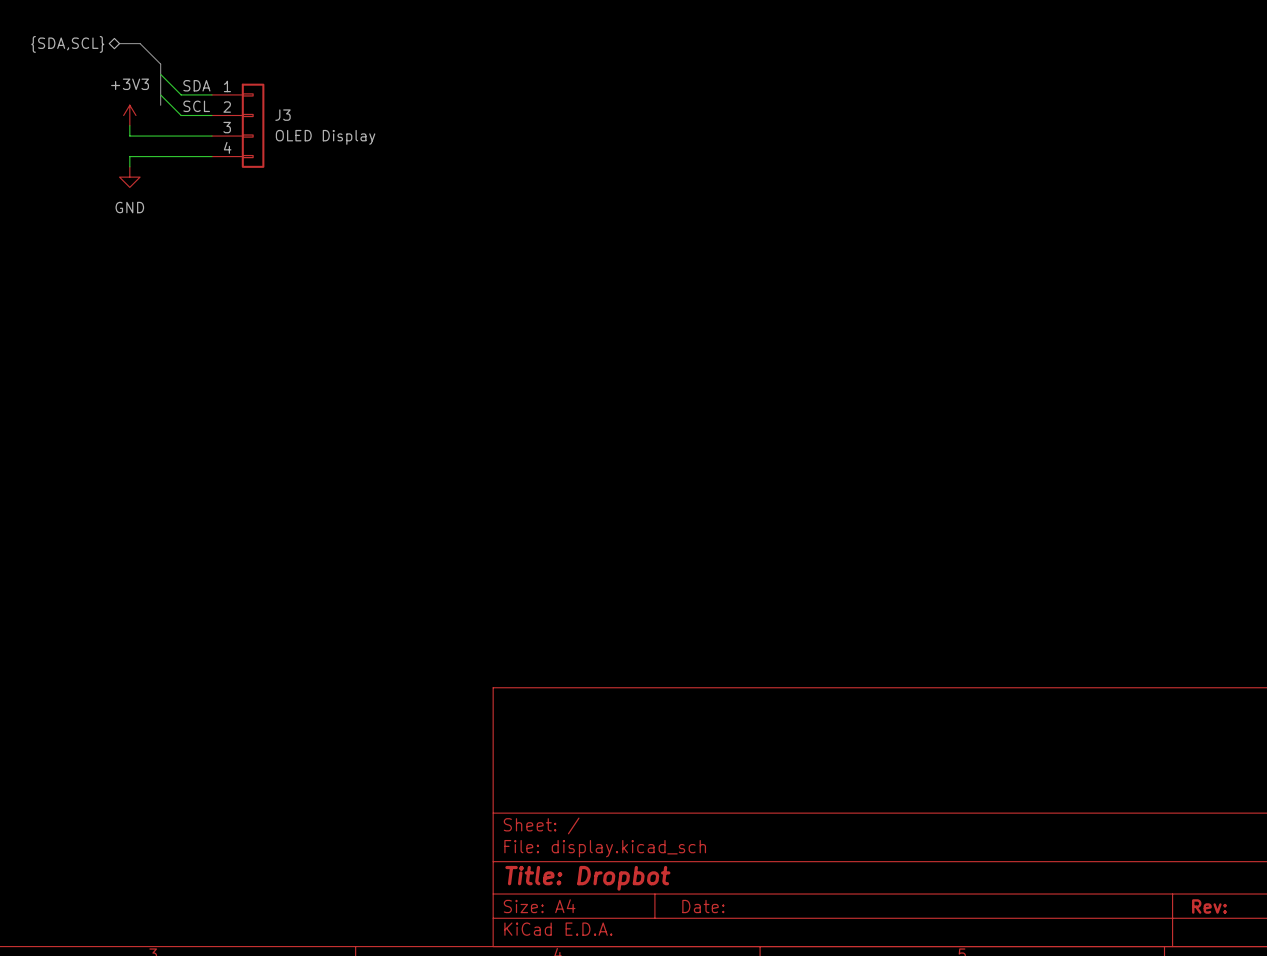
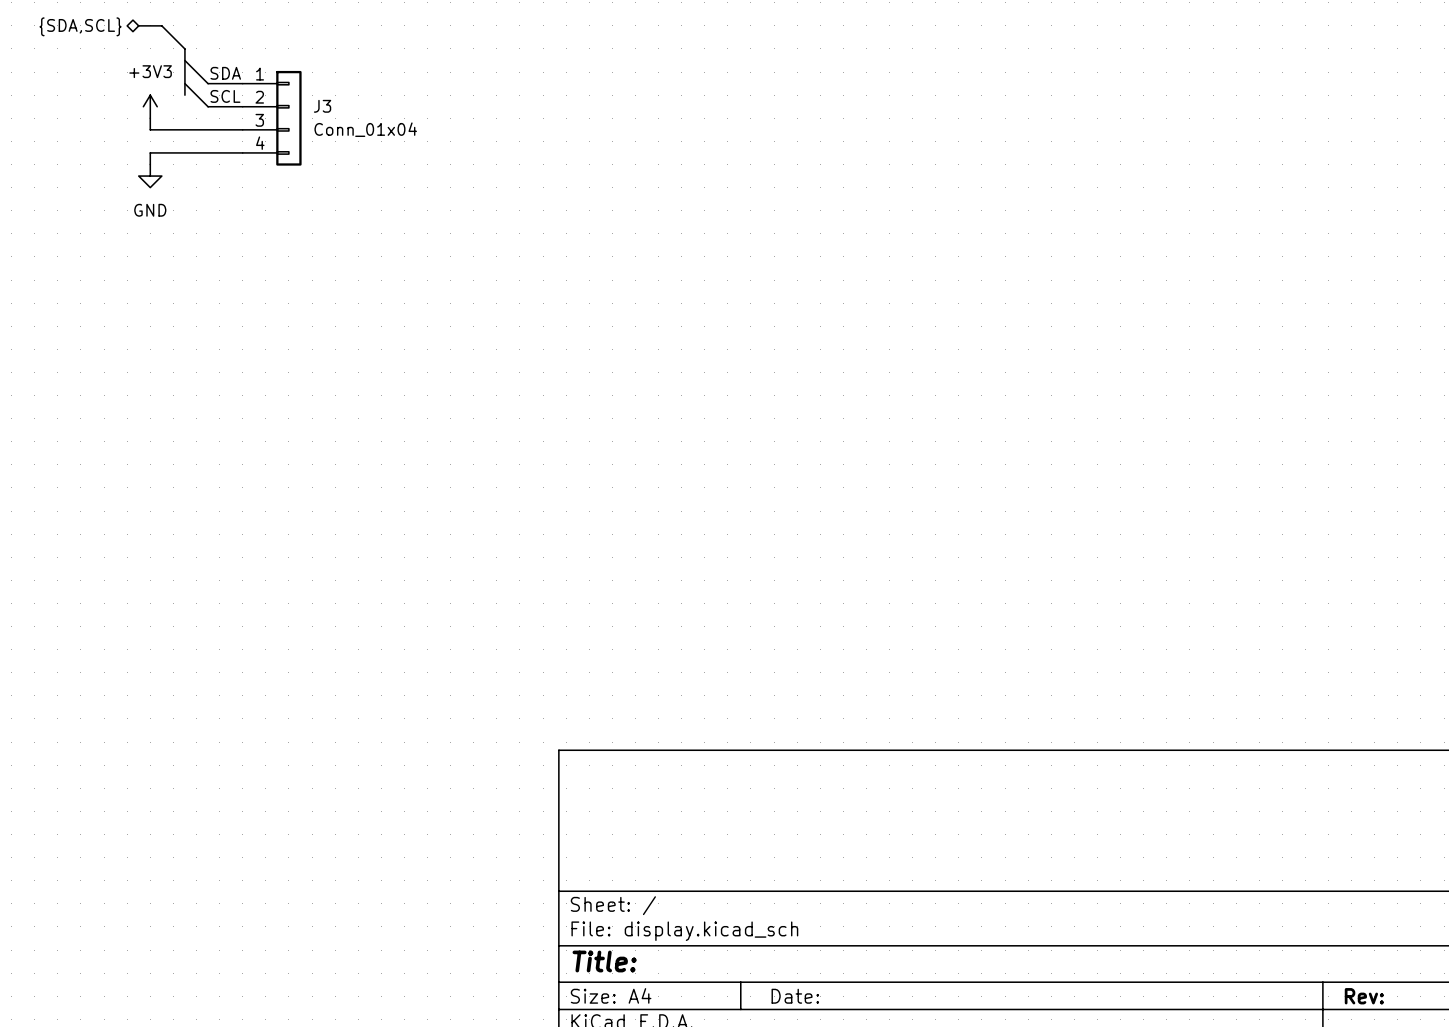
J3 value: OLED Display (325, 137) -> Conn_01x04 (365, 129)
title block: Title: Dropbot (587, 878) -> Title: (604, 961)

